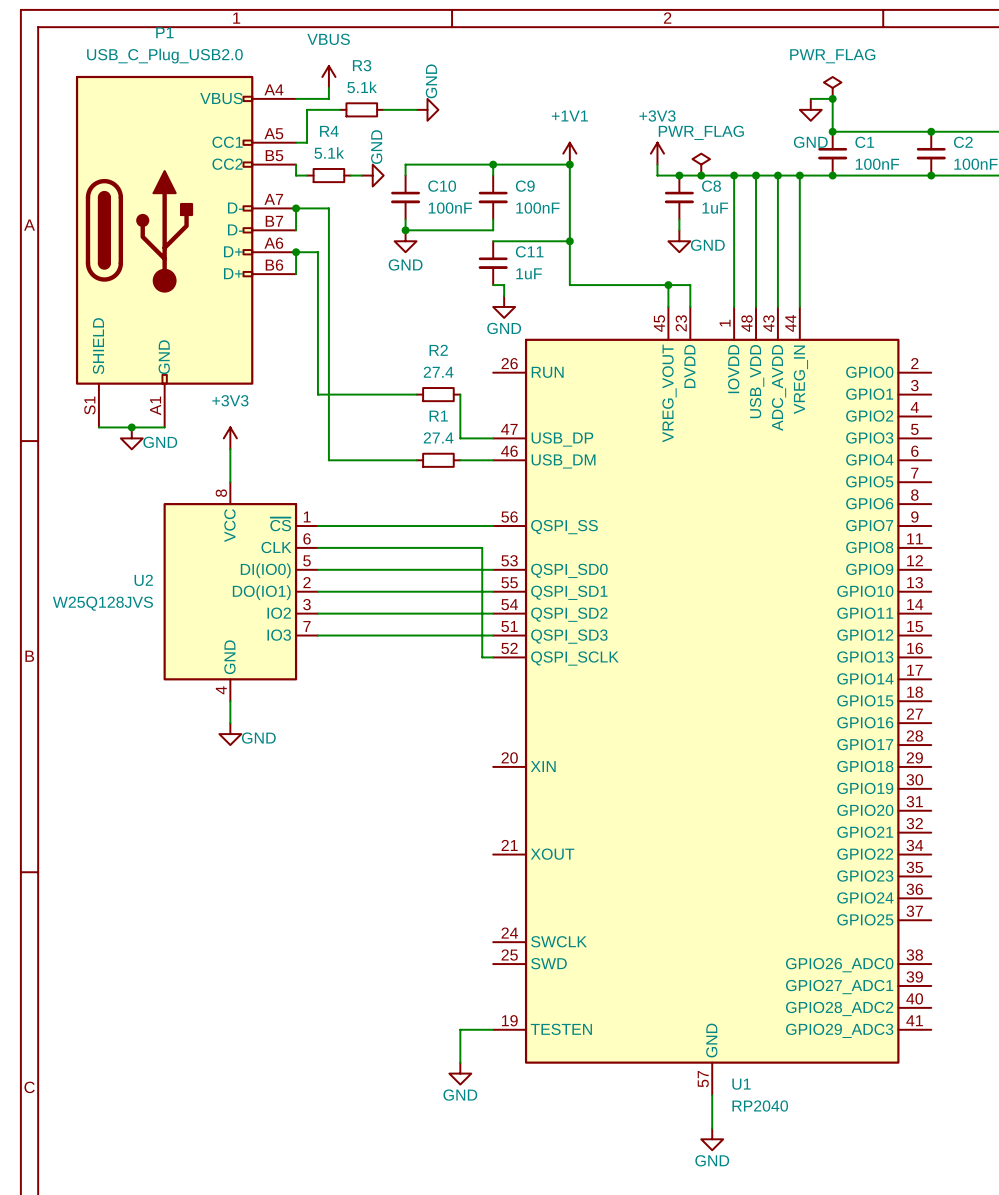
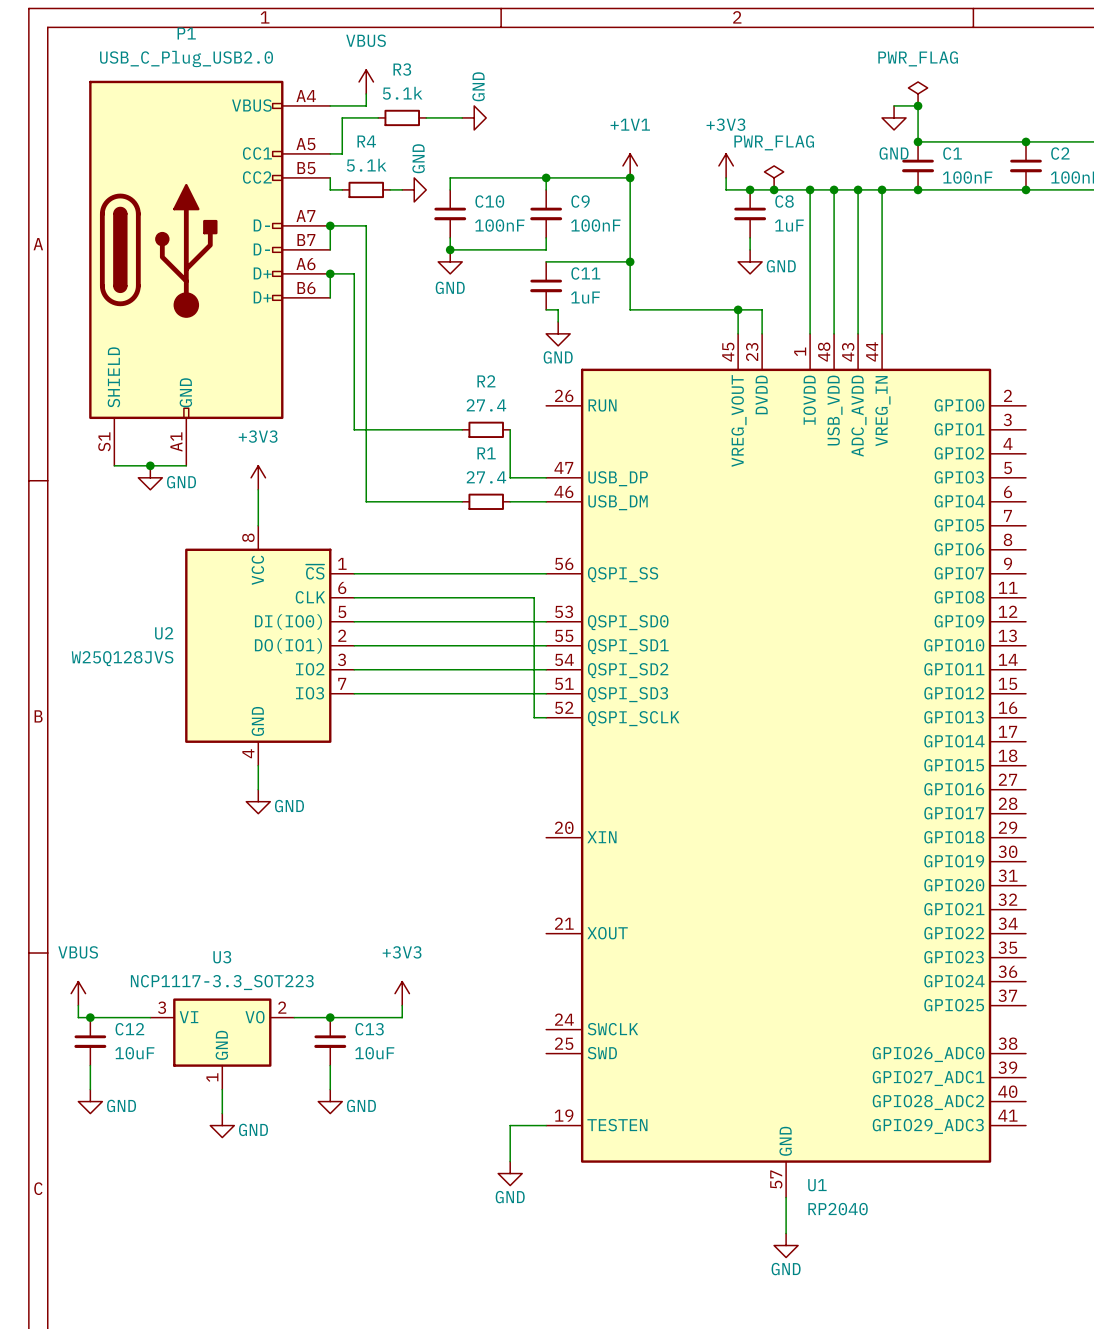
power symbol: none -> VBUS (78, 993)
power symbol: none -> +3V3 (402, 993)
wire: none -> (78, 1005) (78, 1017) (150, 1017)
wire: none -> (402, 1005) (402, 1017) (294, 1017)
junction: none -> (90, 1017)
junction: none -> (330, 1017)
C12: none -> 10uF (90, 1041)
C13: none -> 10uF (330, 1041)
U3: none -> NCP1117-3.3_SOT223 (222, 1044)
wire: none -> (90, 1065) (90, 1089)
wire: none -> (330, 1065) (330, 1089)
wire: none -> (222, 1089) (222, 1113)
power symbol: none -> GND (90, 1101)
power symbol: none -> GND (330, 1101)
power symbol: none -> GND (222, 1125)

